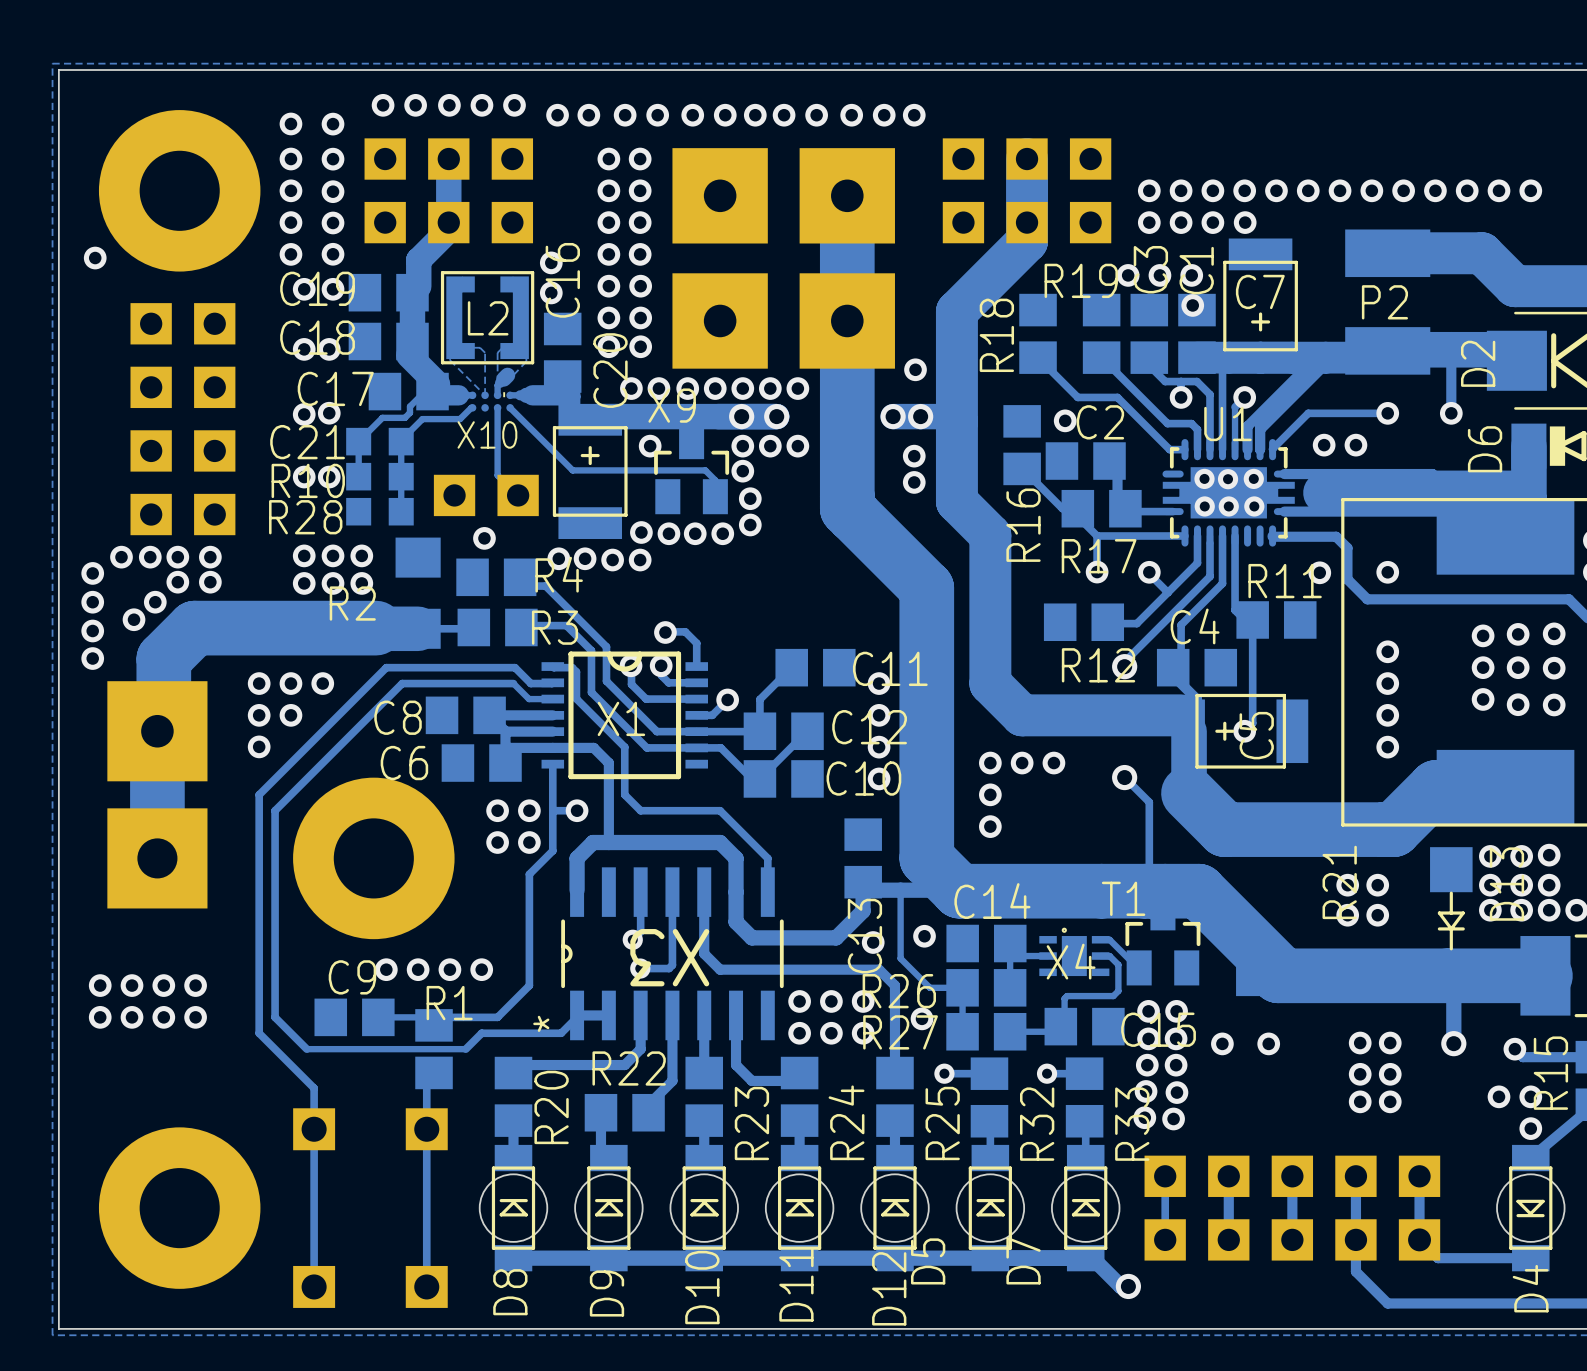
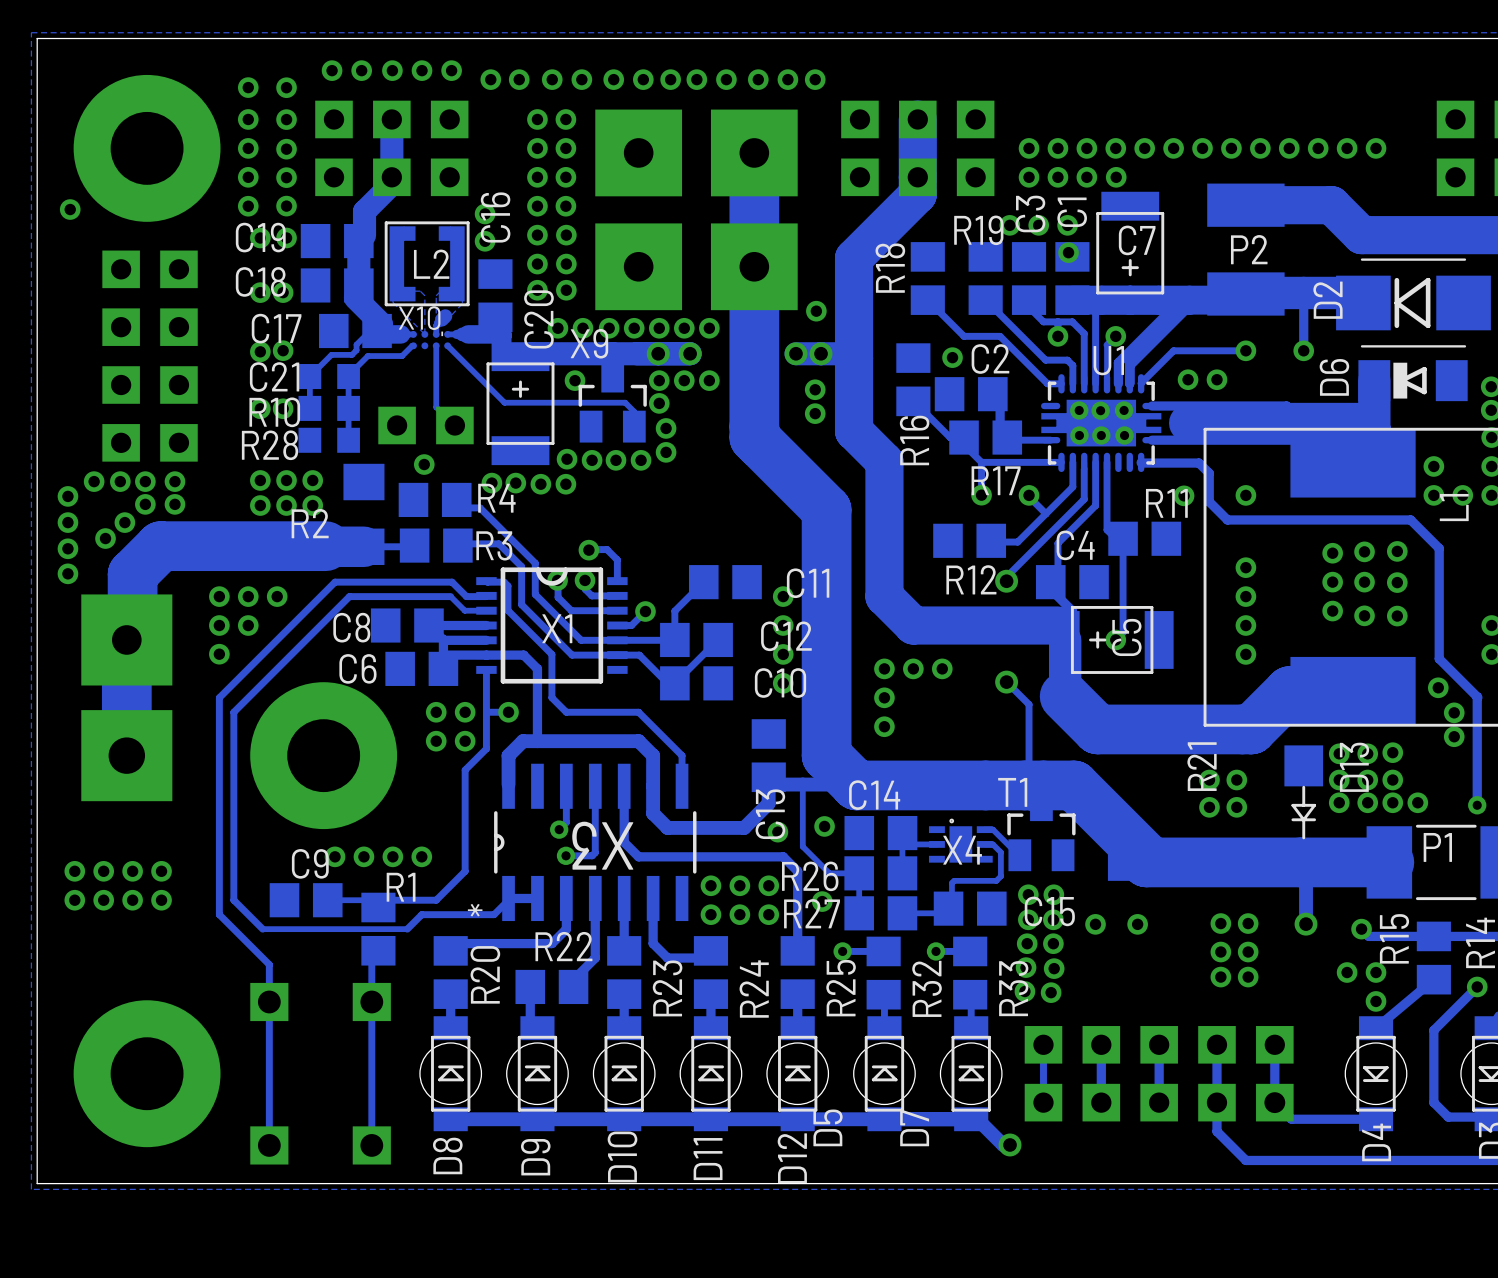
X10 name position: X10 (487, 434) -> X10 (419, 318)

